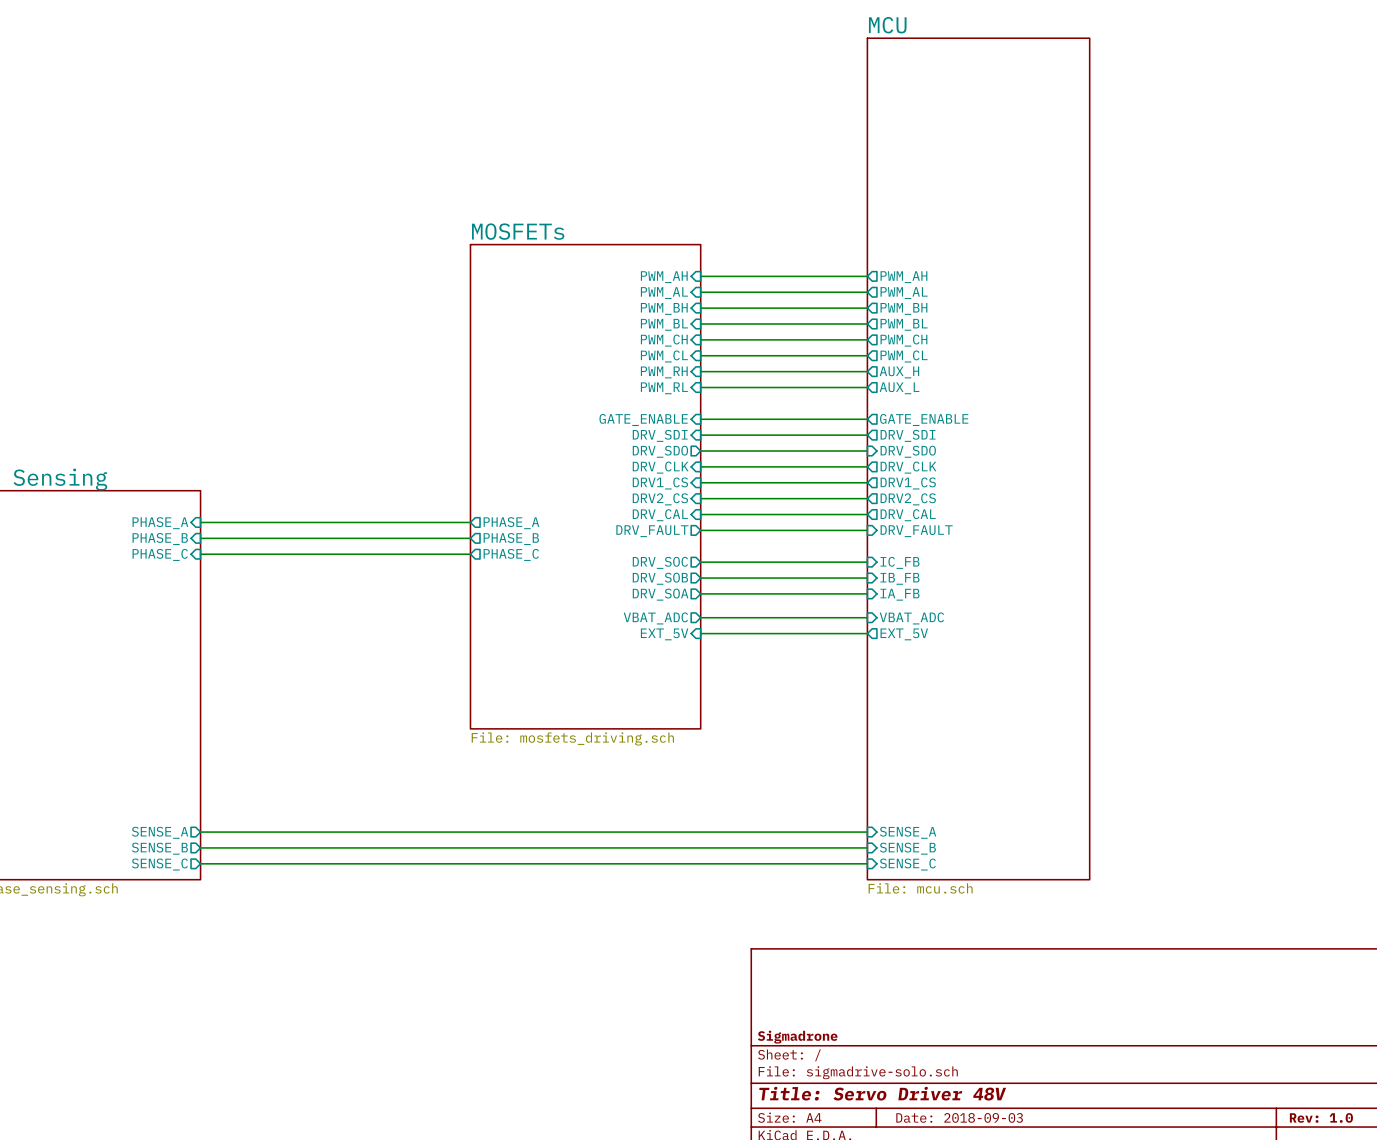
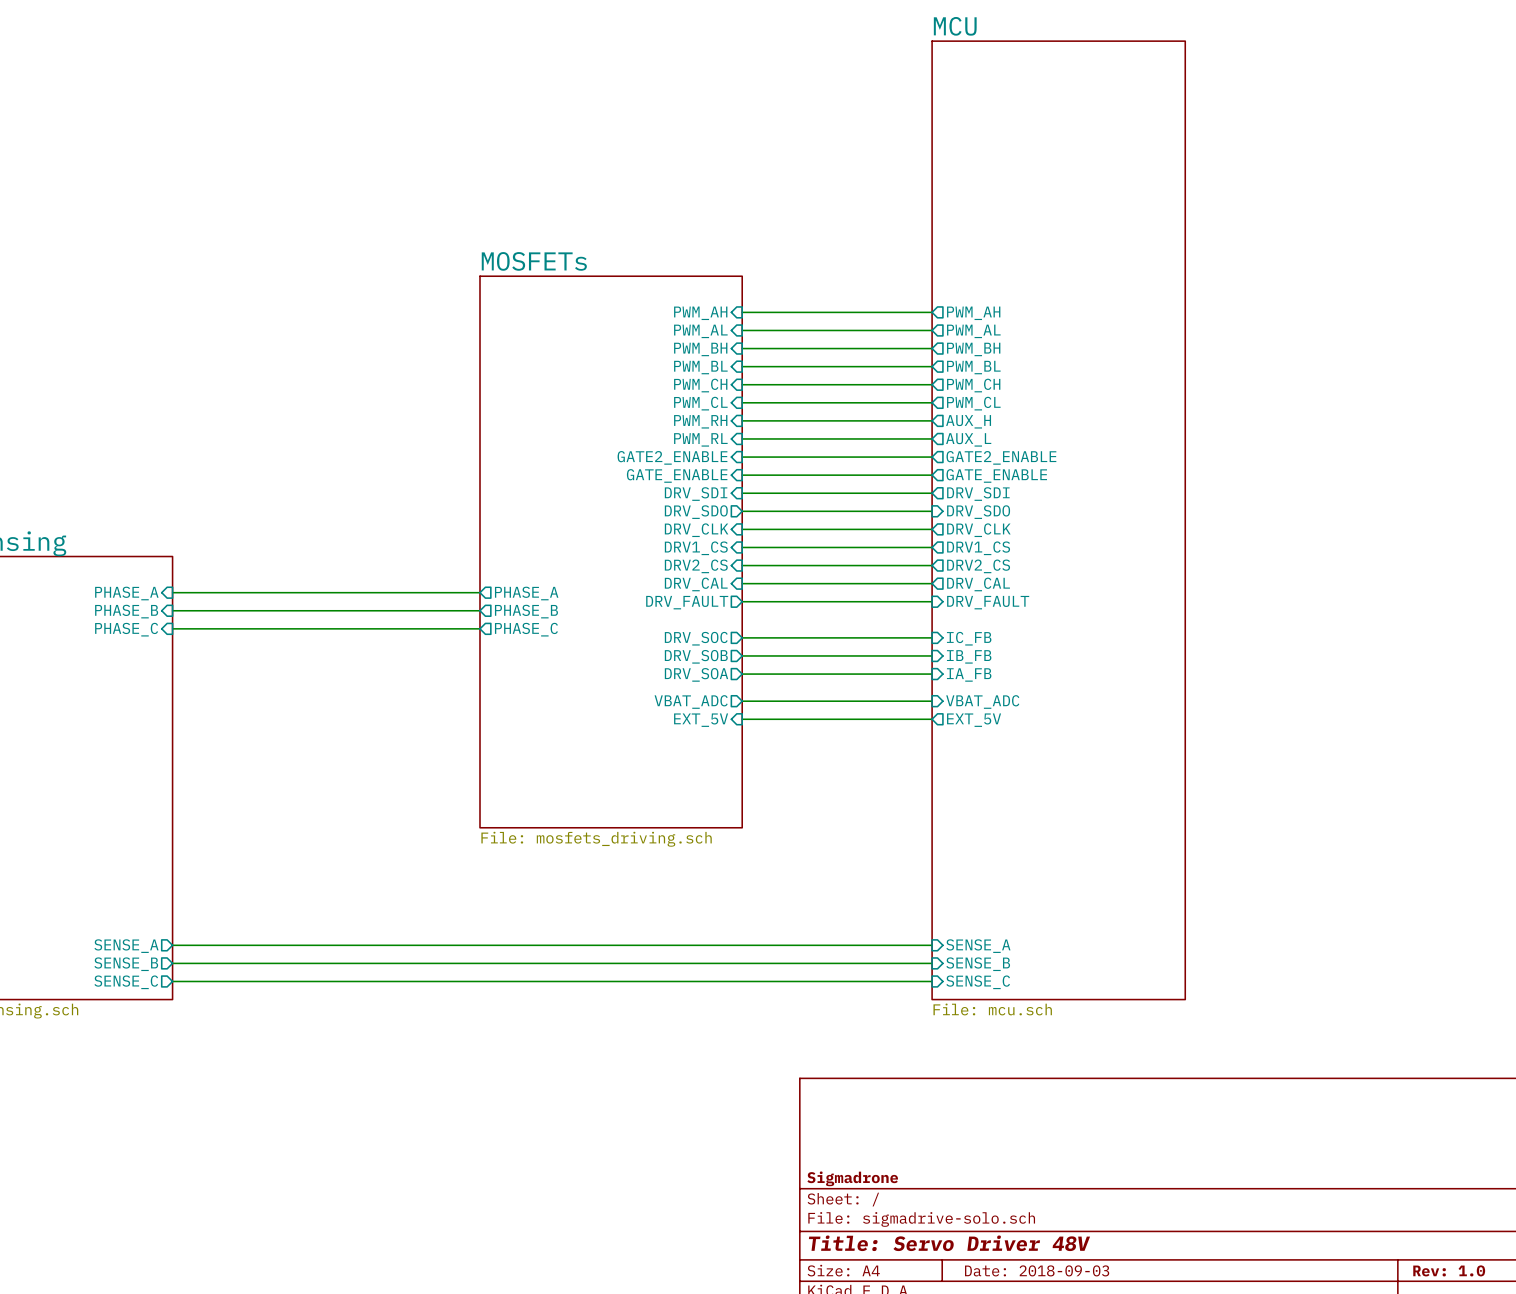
wire: none -> (742, 457) (932, 457)
sheet pin: none -> GATE2_ENABLE (672, 457)
sheet pin: none -> GATE2_ENABLE (1001, 457)

